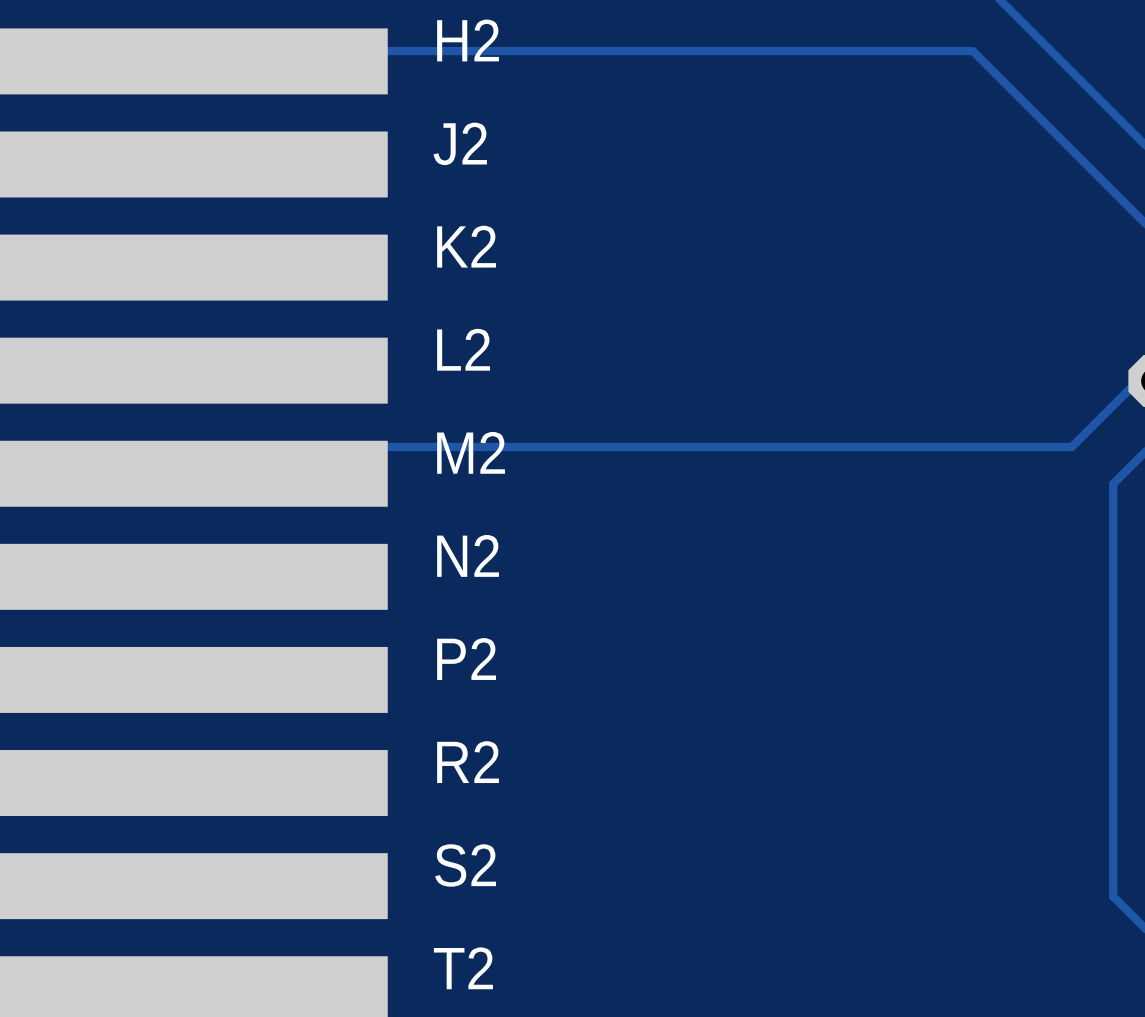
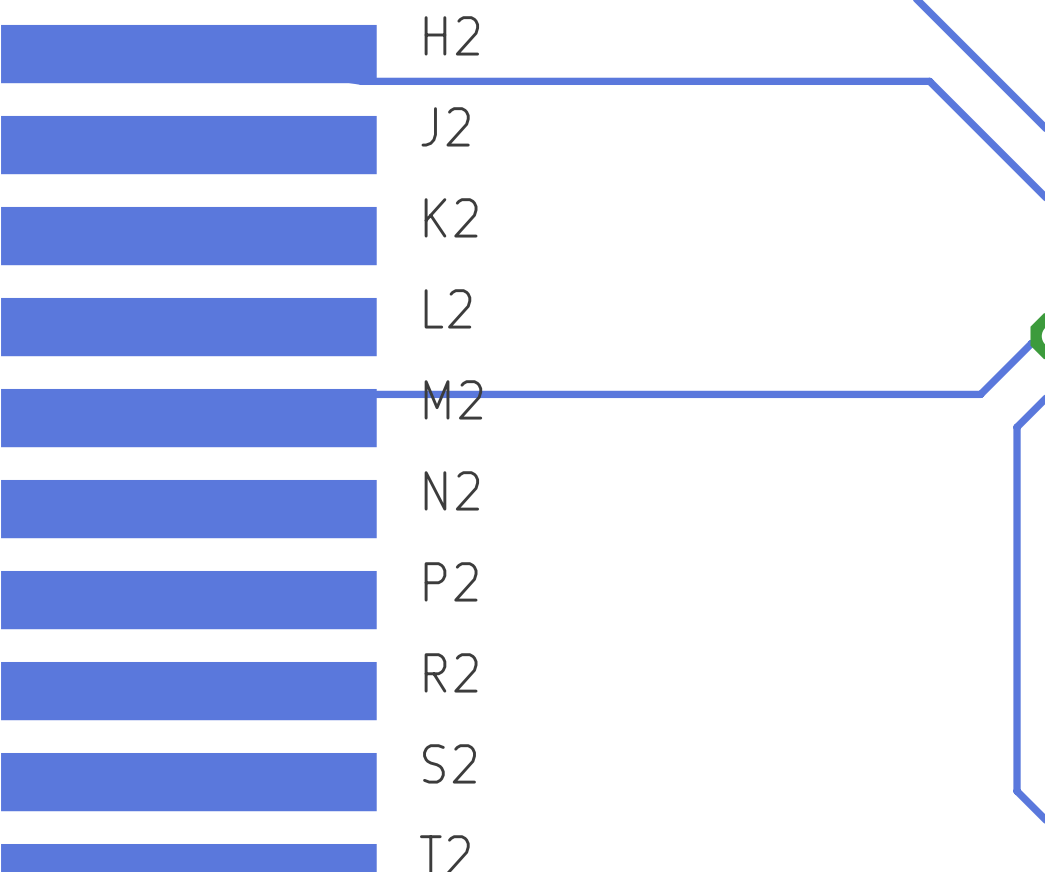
track: (174, 61) (329, 51) (972, 51) (1014, 92) -> (188, 54) (361, 81) (929, 81)

